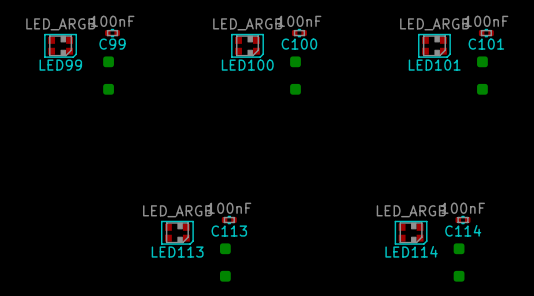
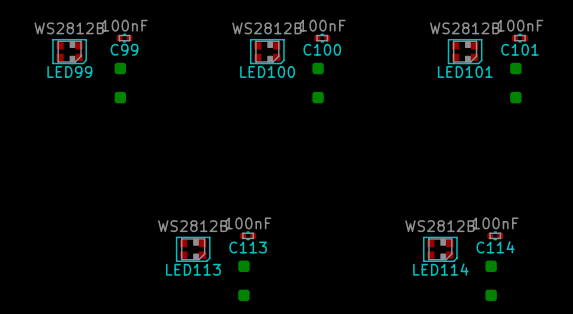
LED99 value: LED_ARGB (60, 24) -> WS2812B (69, 28)
LED100 value: LED_ARGB (247, 24) -> WS2812B (267, 28)
LED101 value: LED_ARGB (434, 24) -> WS2812B (464, 28)
LED113 value: LED_ARGB (177, 211) -> WS2812B (192, 226)
LED114 value: LED_ARGB (411, 211) -> WS2812B (440, 226)

